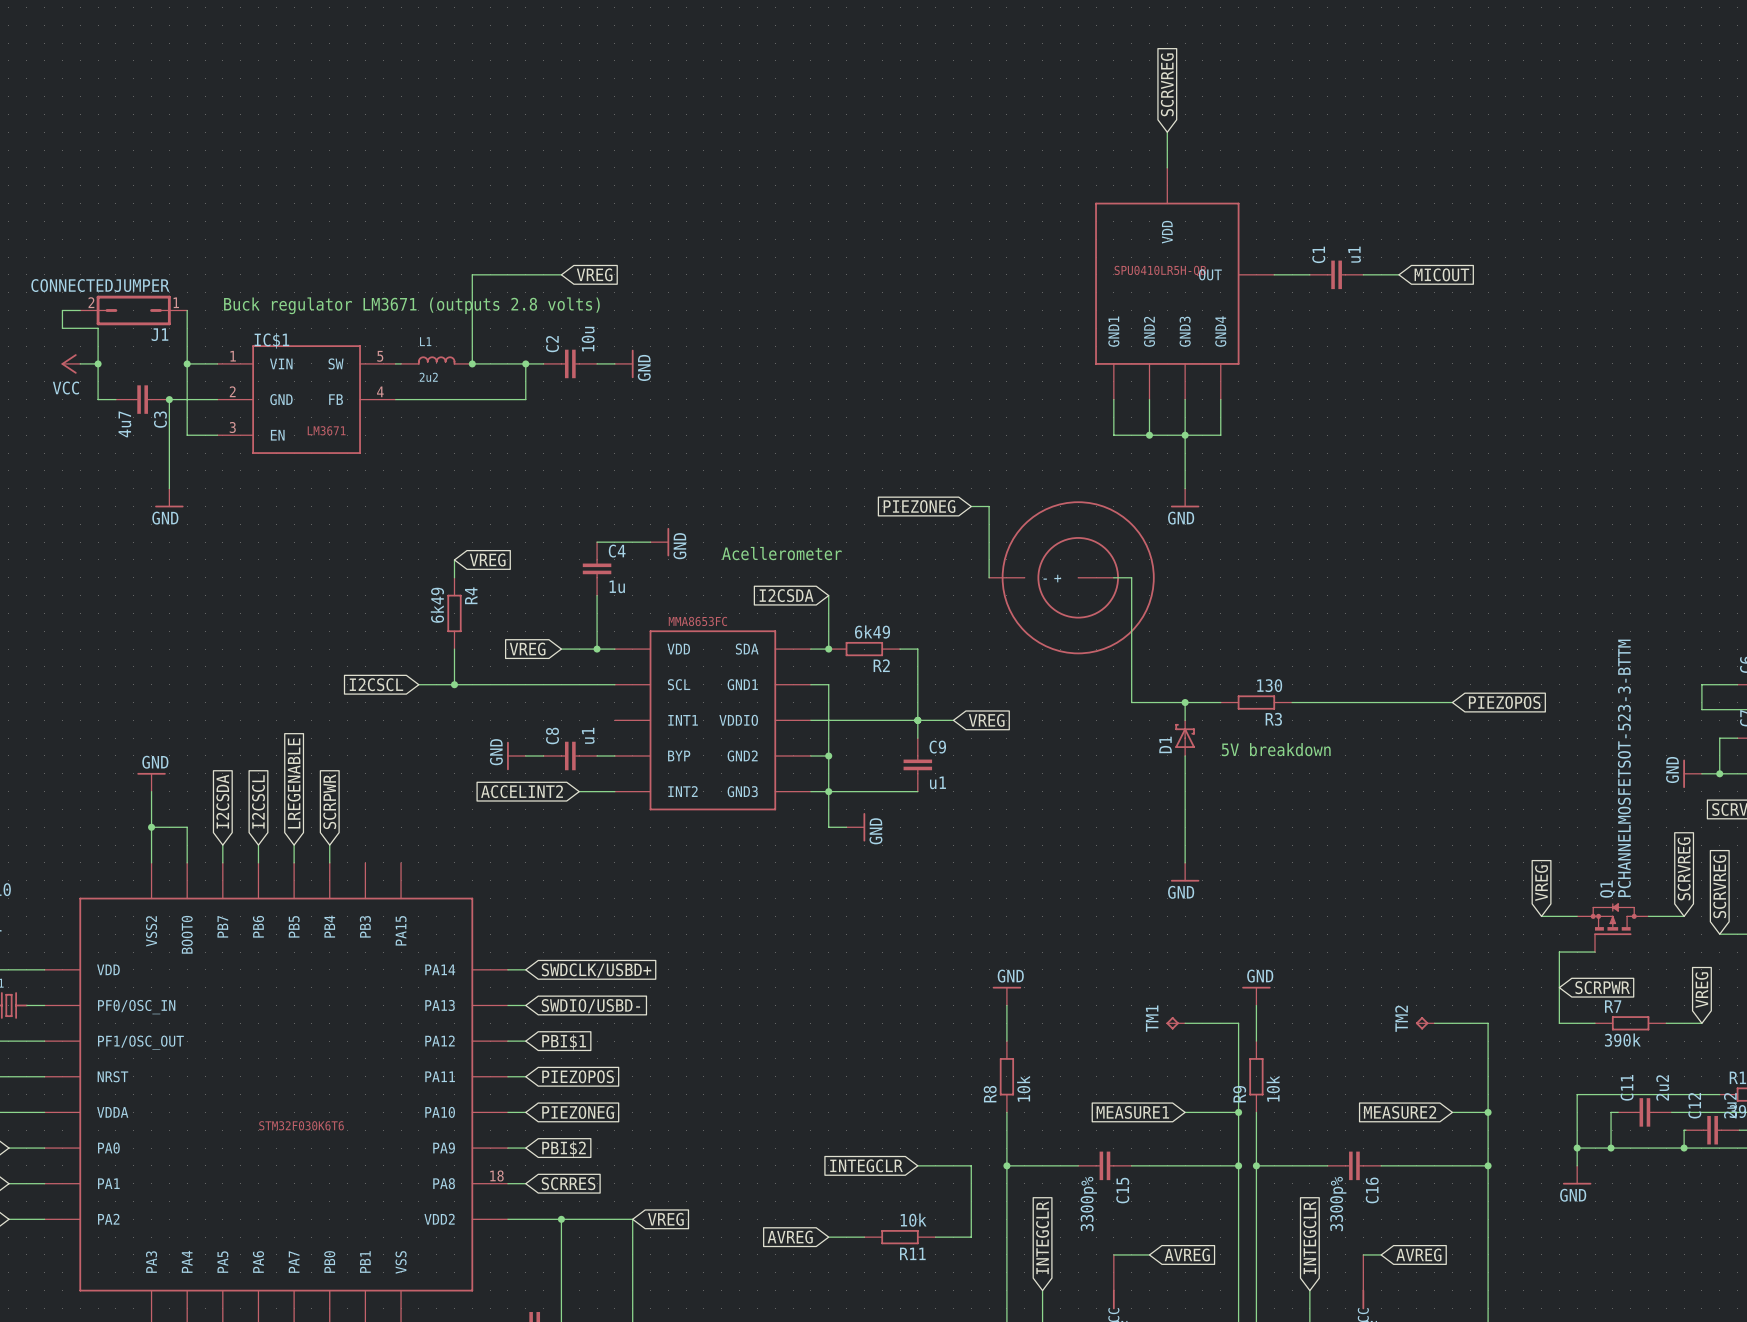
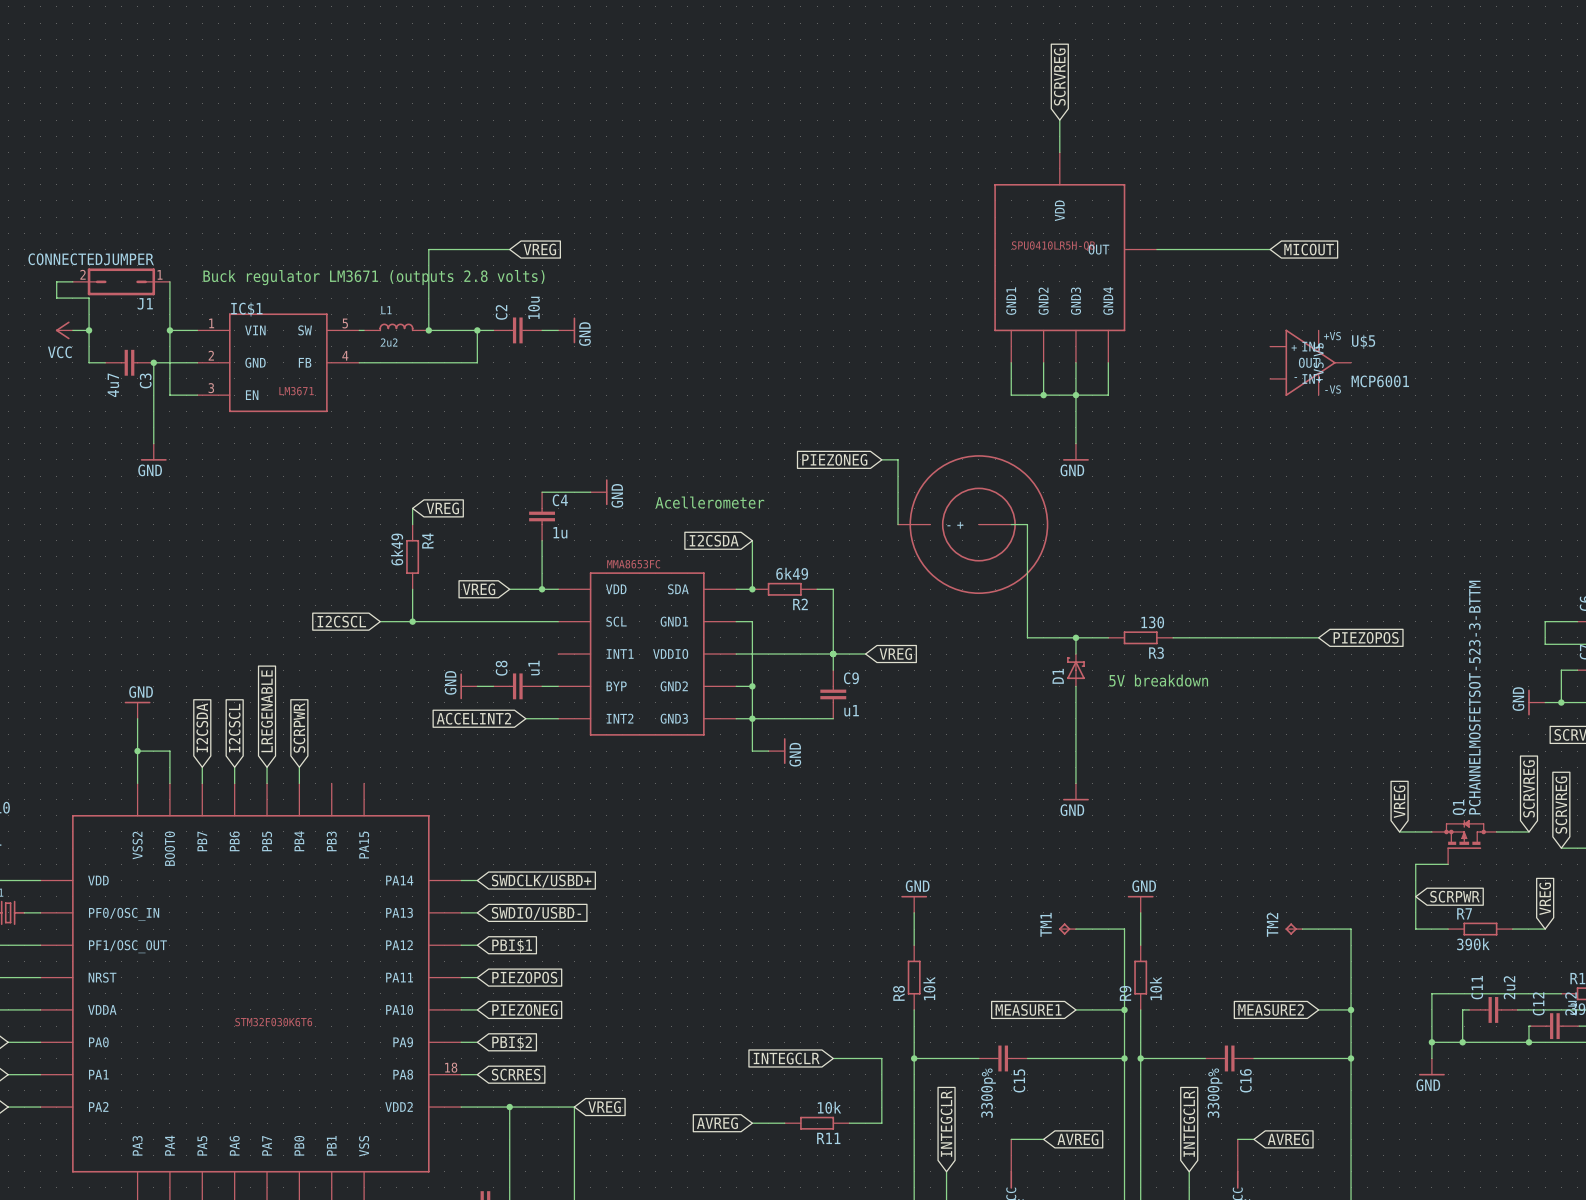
C1: u1 (1336, 274) -> none
U$5: none -> MCP6001 (1310, 362)

